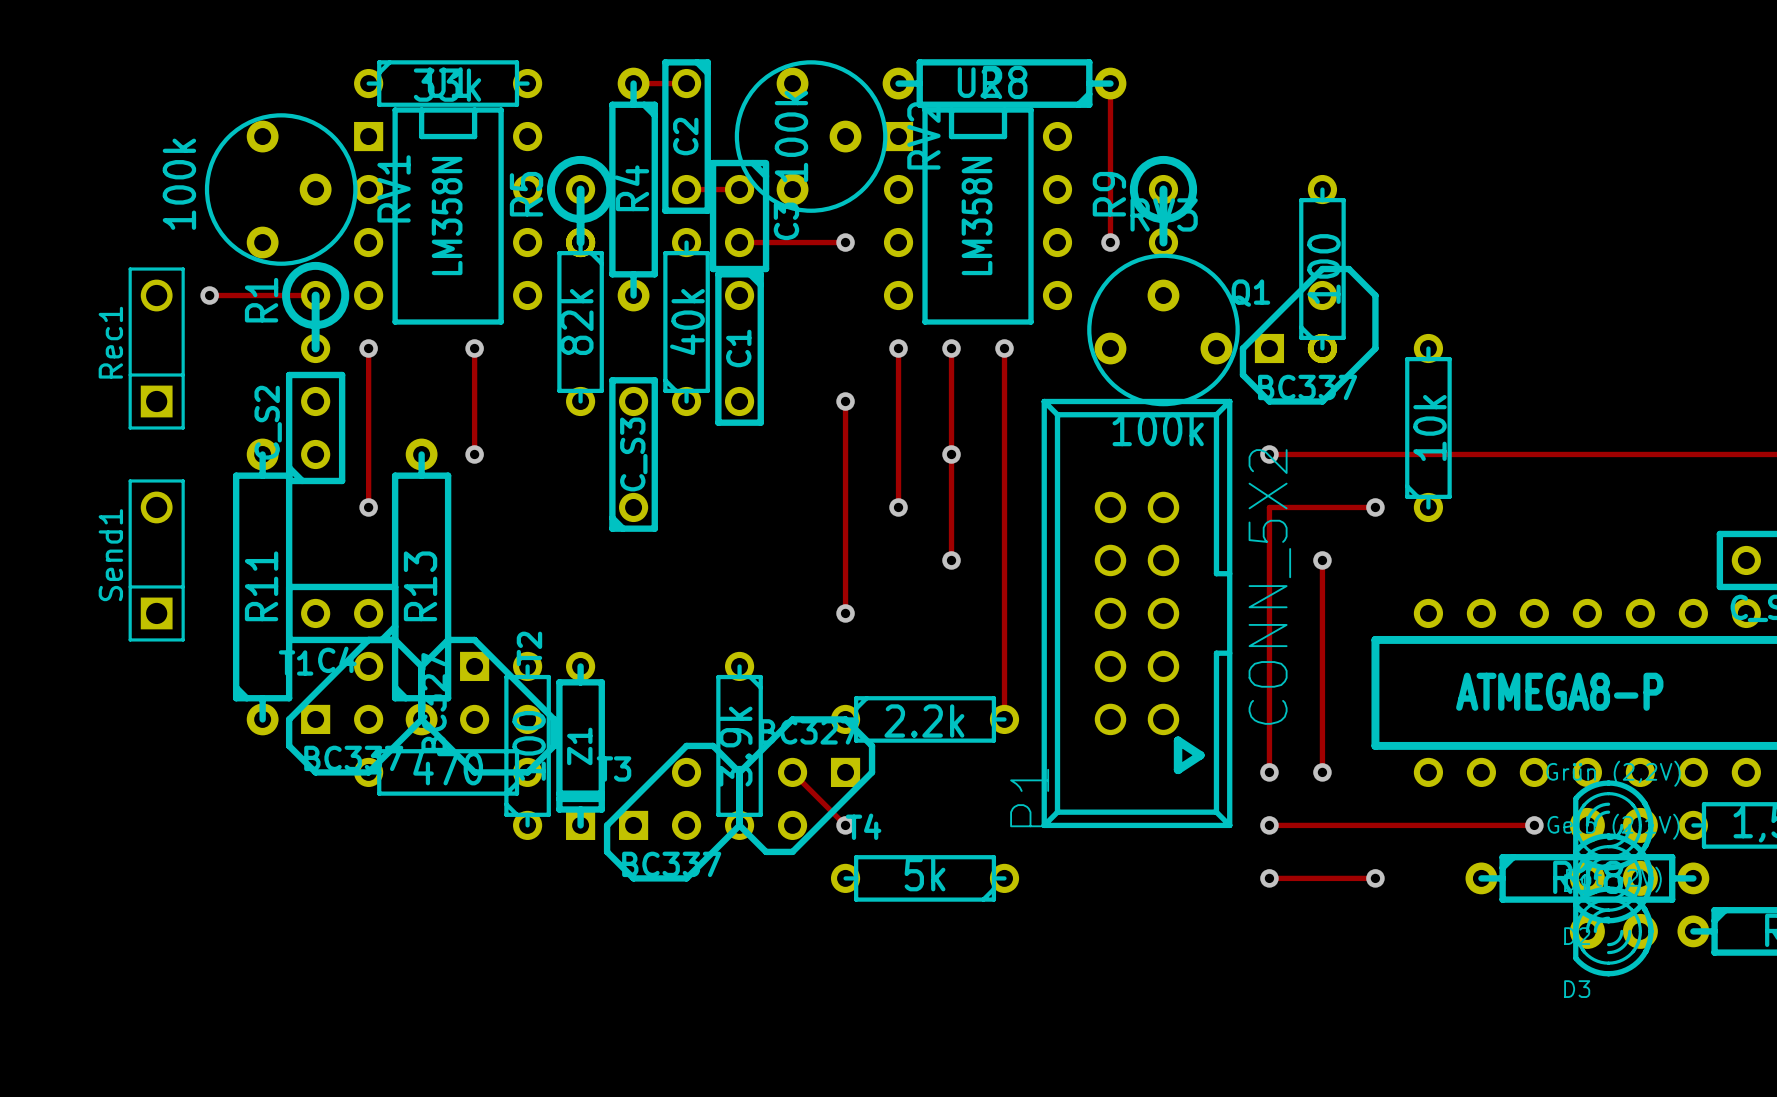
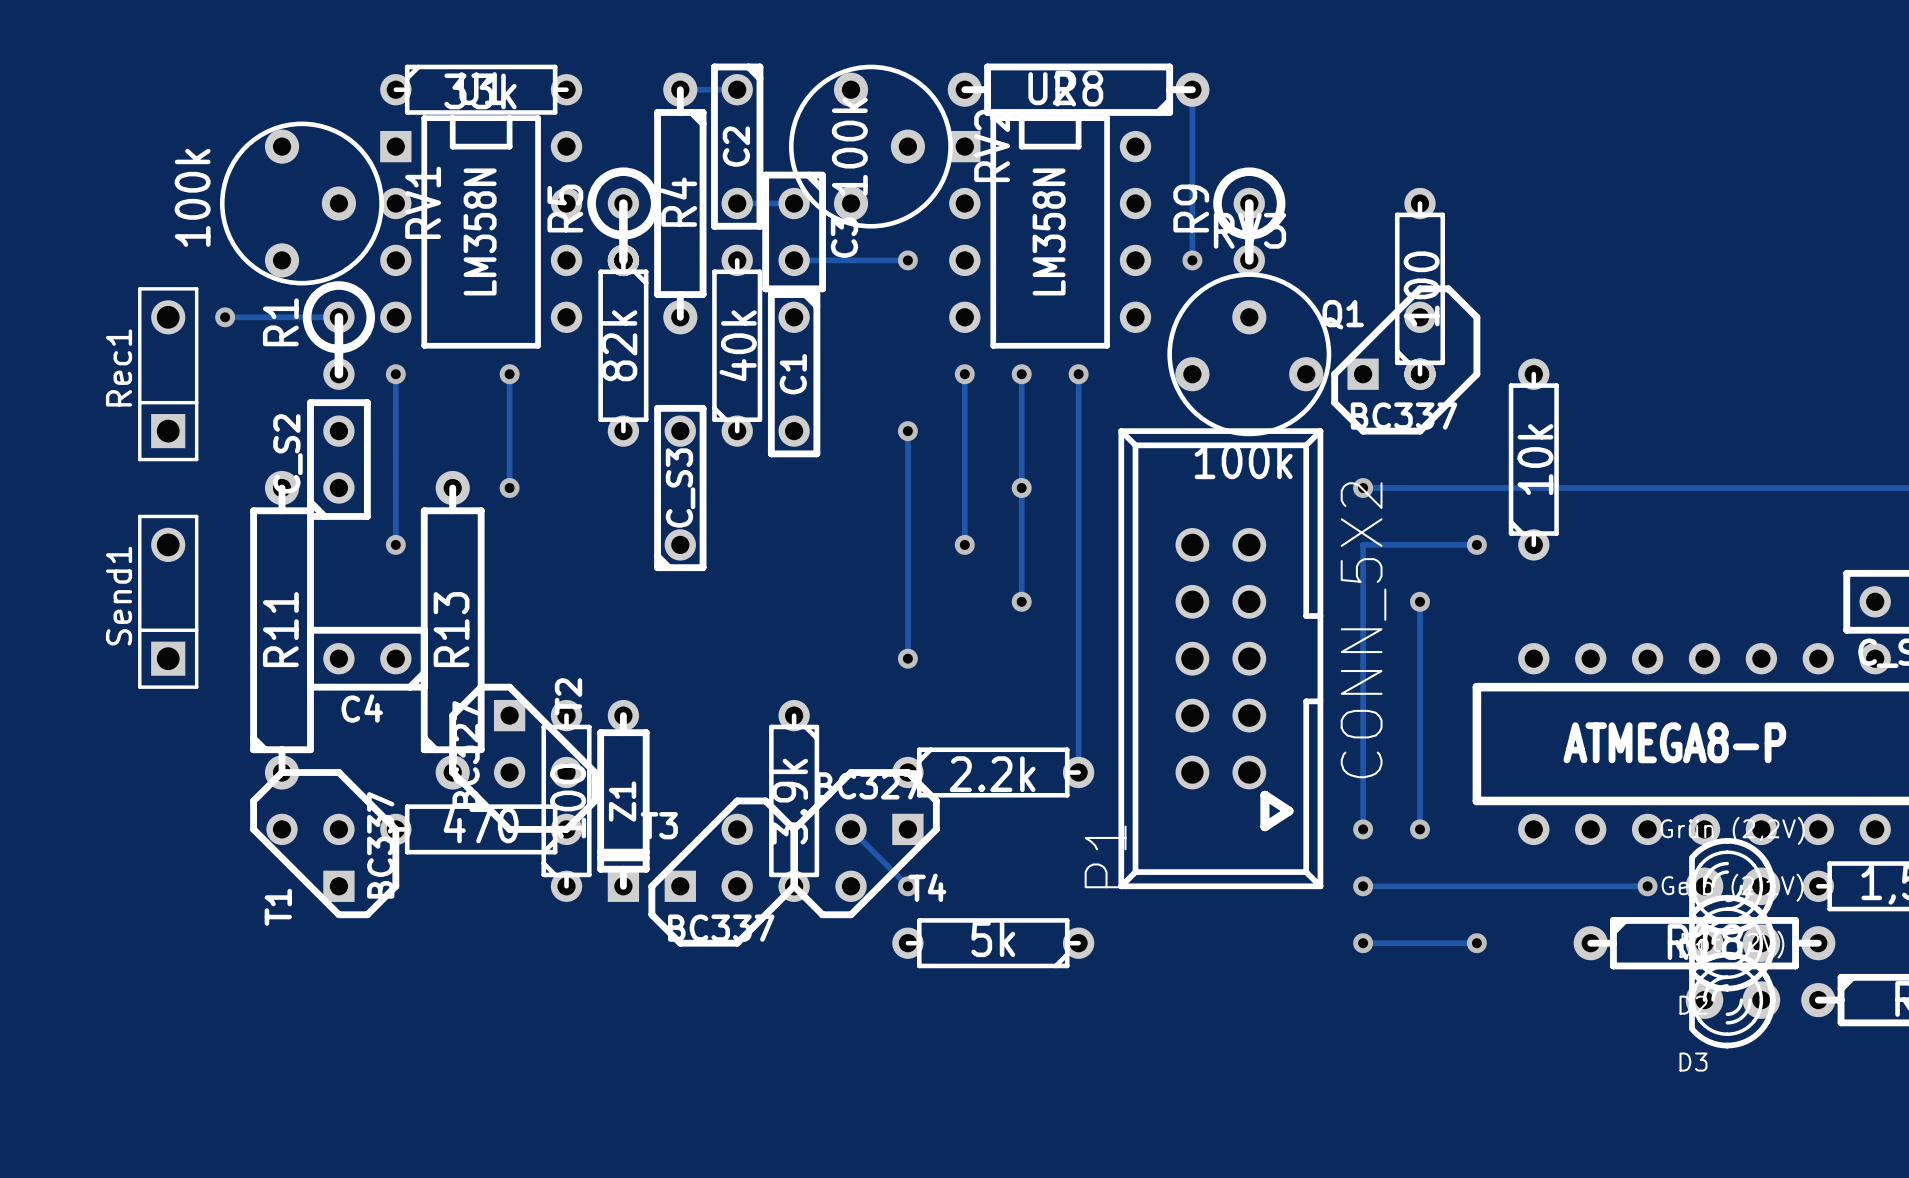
T1 rotation: 0° (355, 706) -> 90° counterclockwise (324, 843)
T1 position: (355, 706) -> (324, 843)

